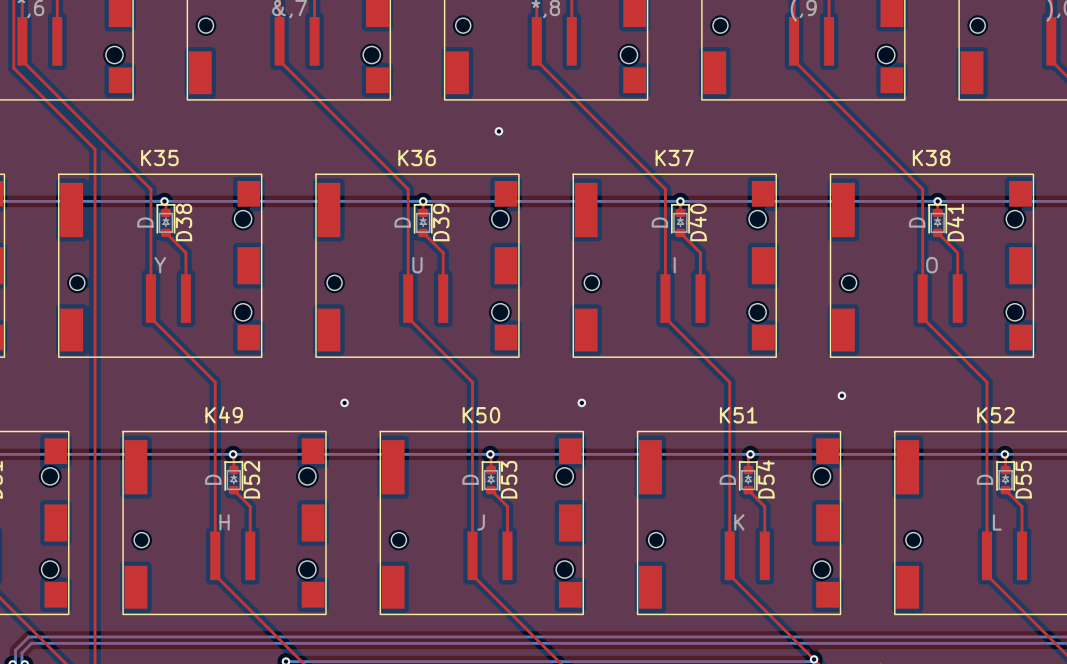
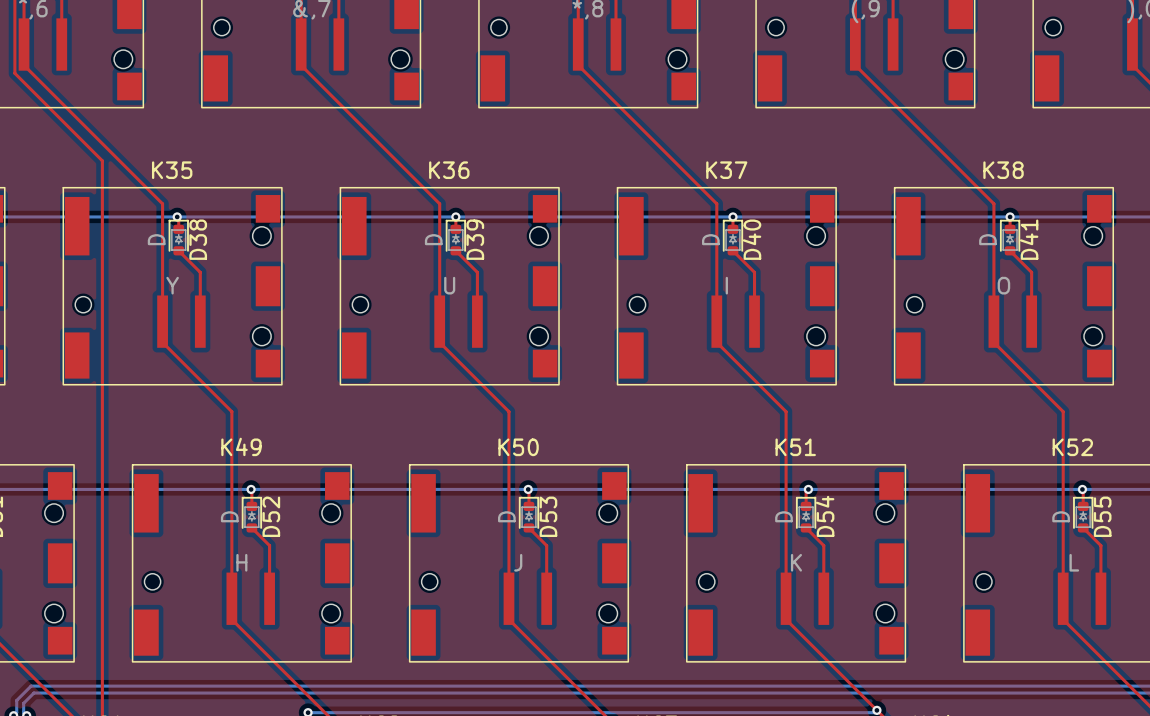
via: (498, 131) -> none
via: (841, 395) -> none
via: (344, 402) -> none
via: (581, 402) -> none

